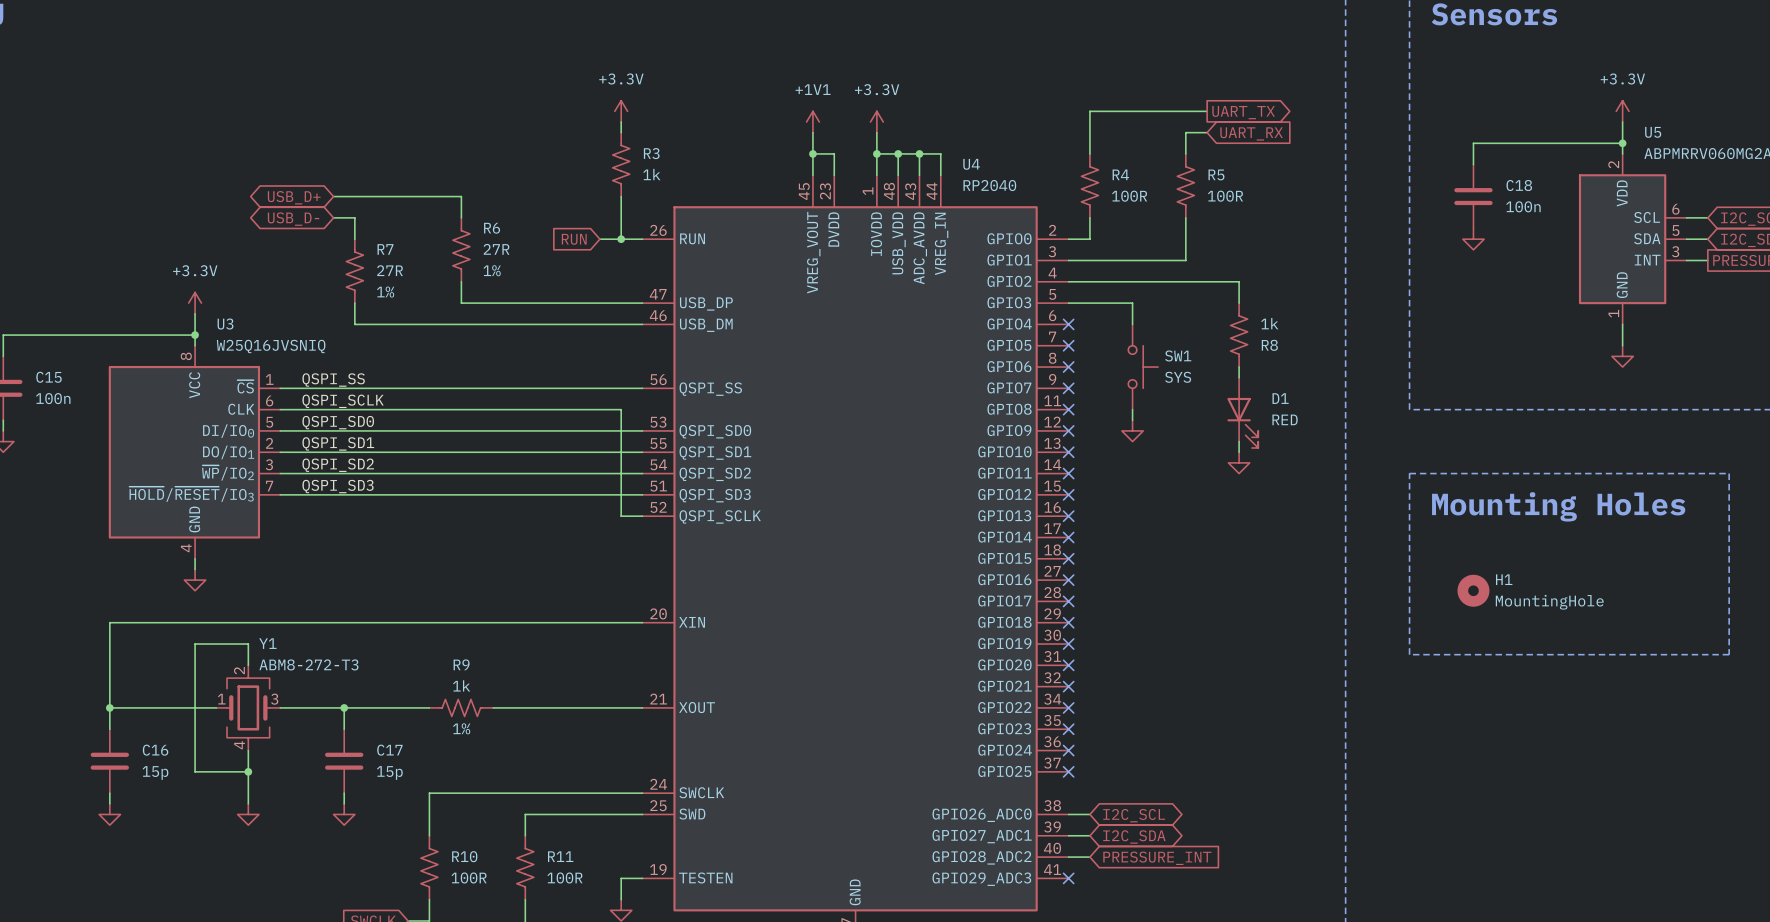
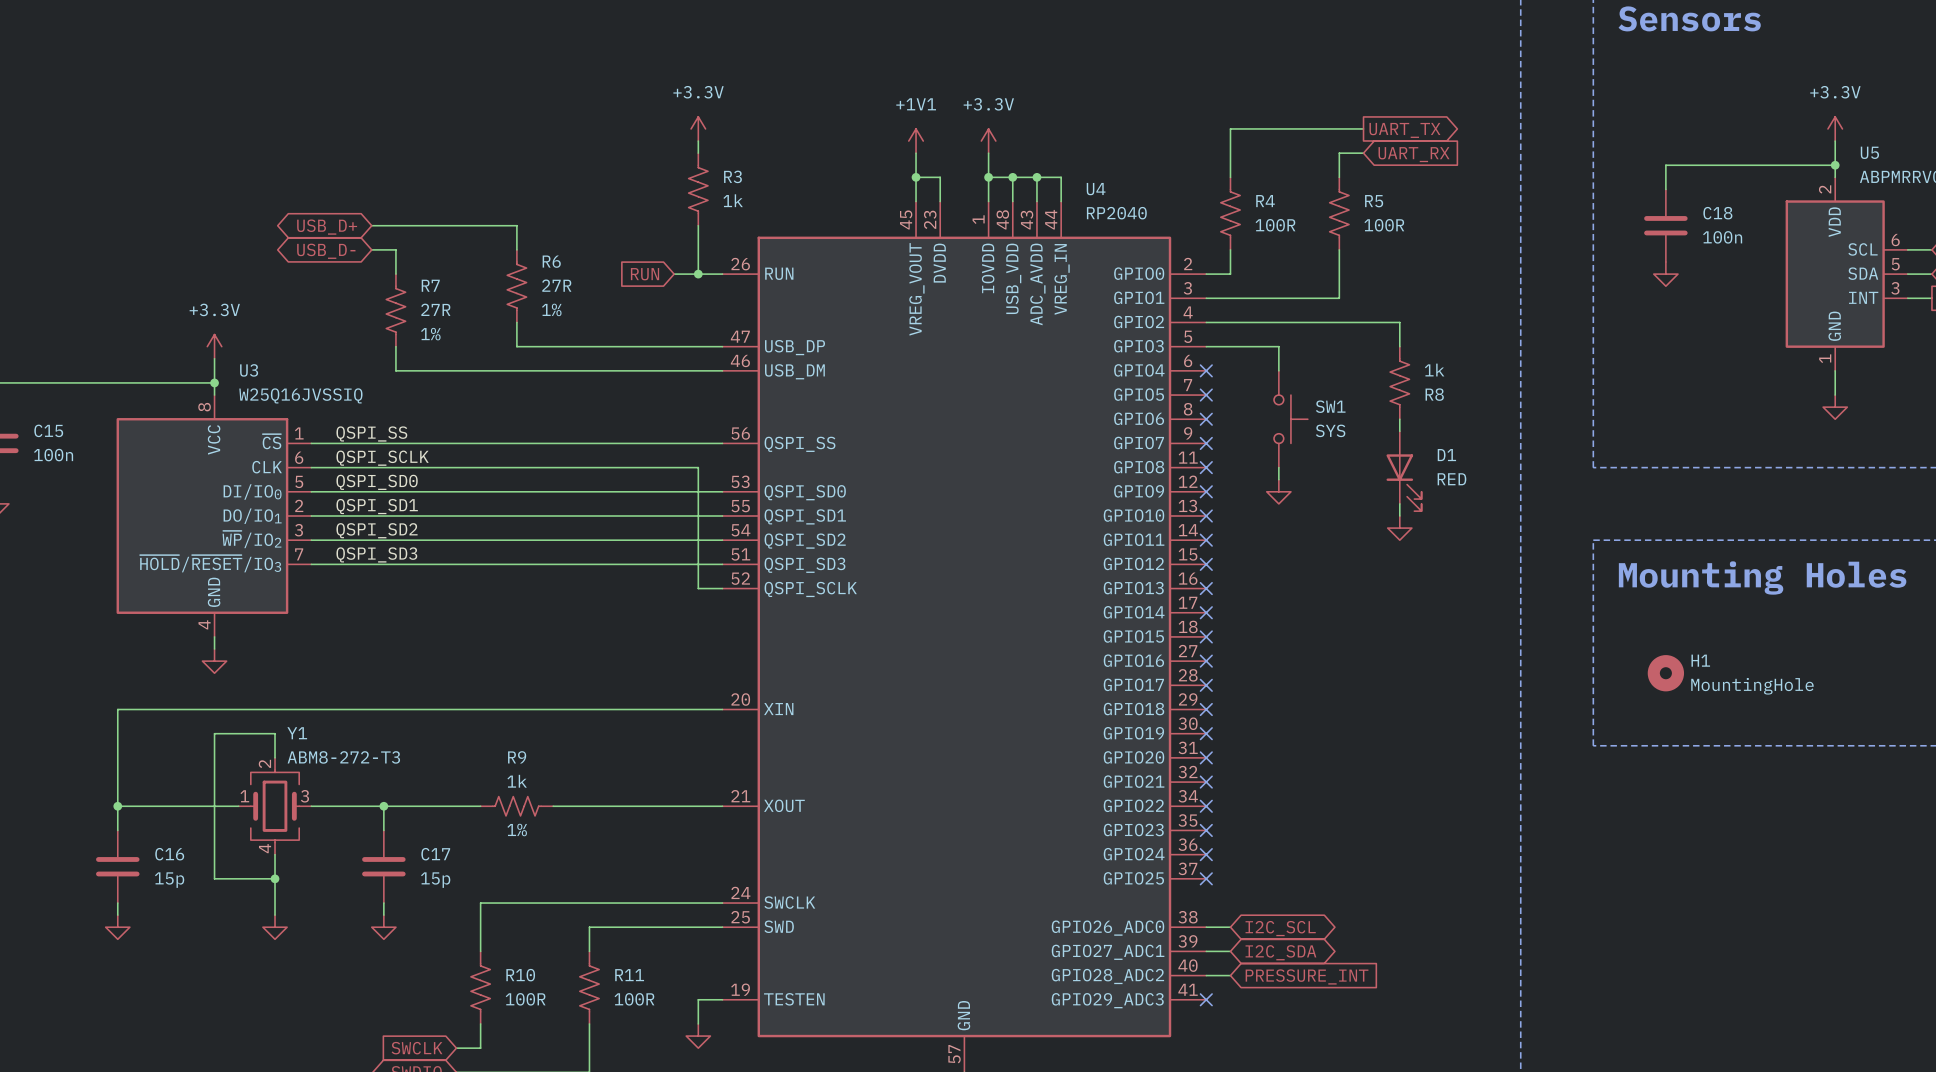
U3 value: W25Q16JVSNIQ (271, 346) -> W25Q16JVSSIQ (300, 395)

